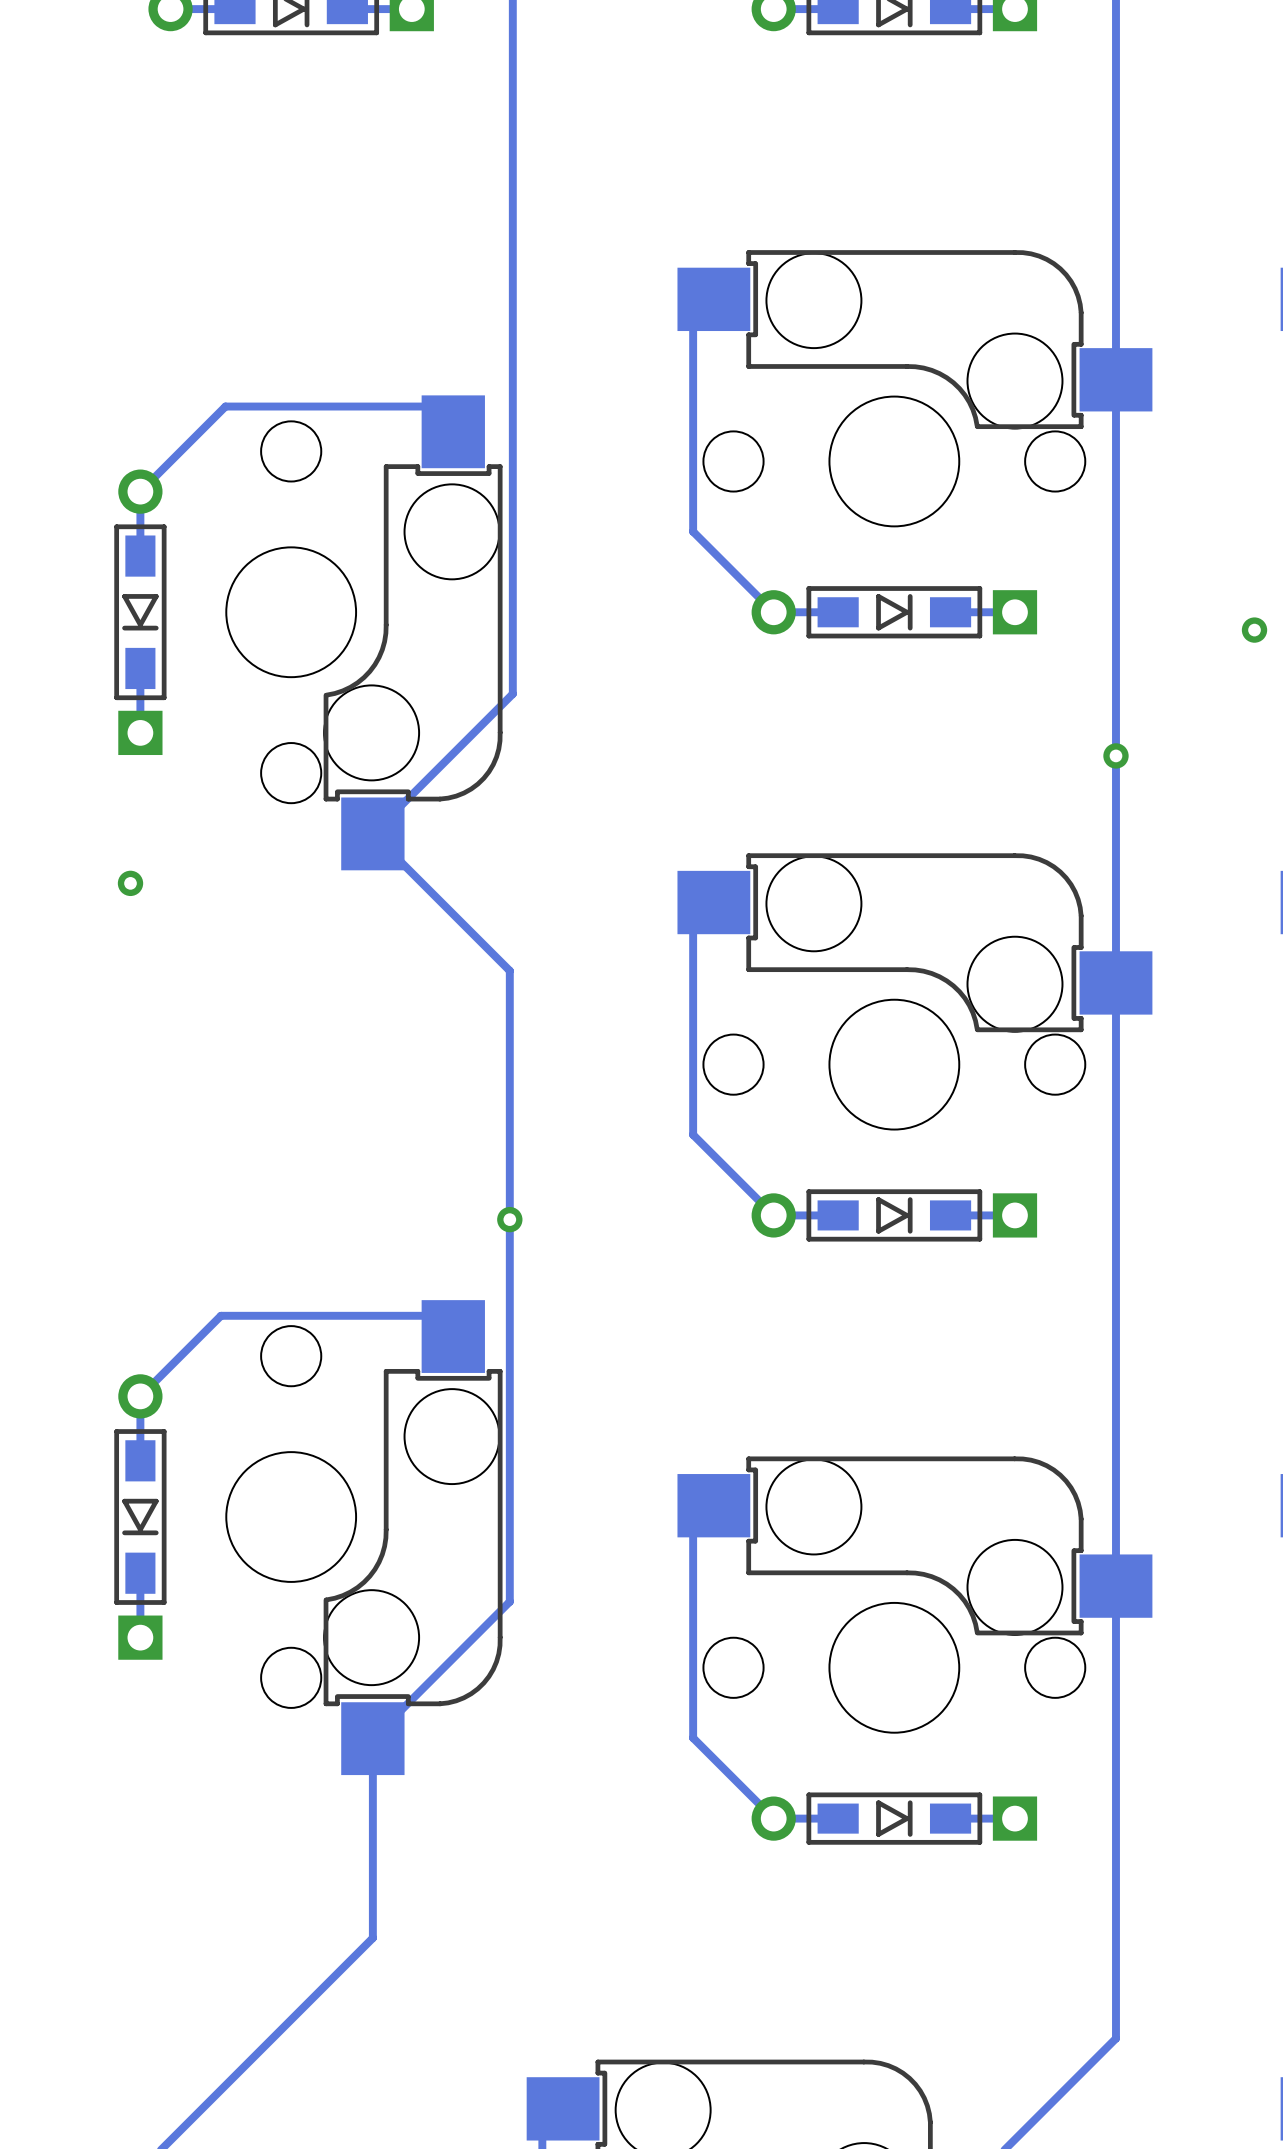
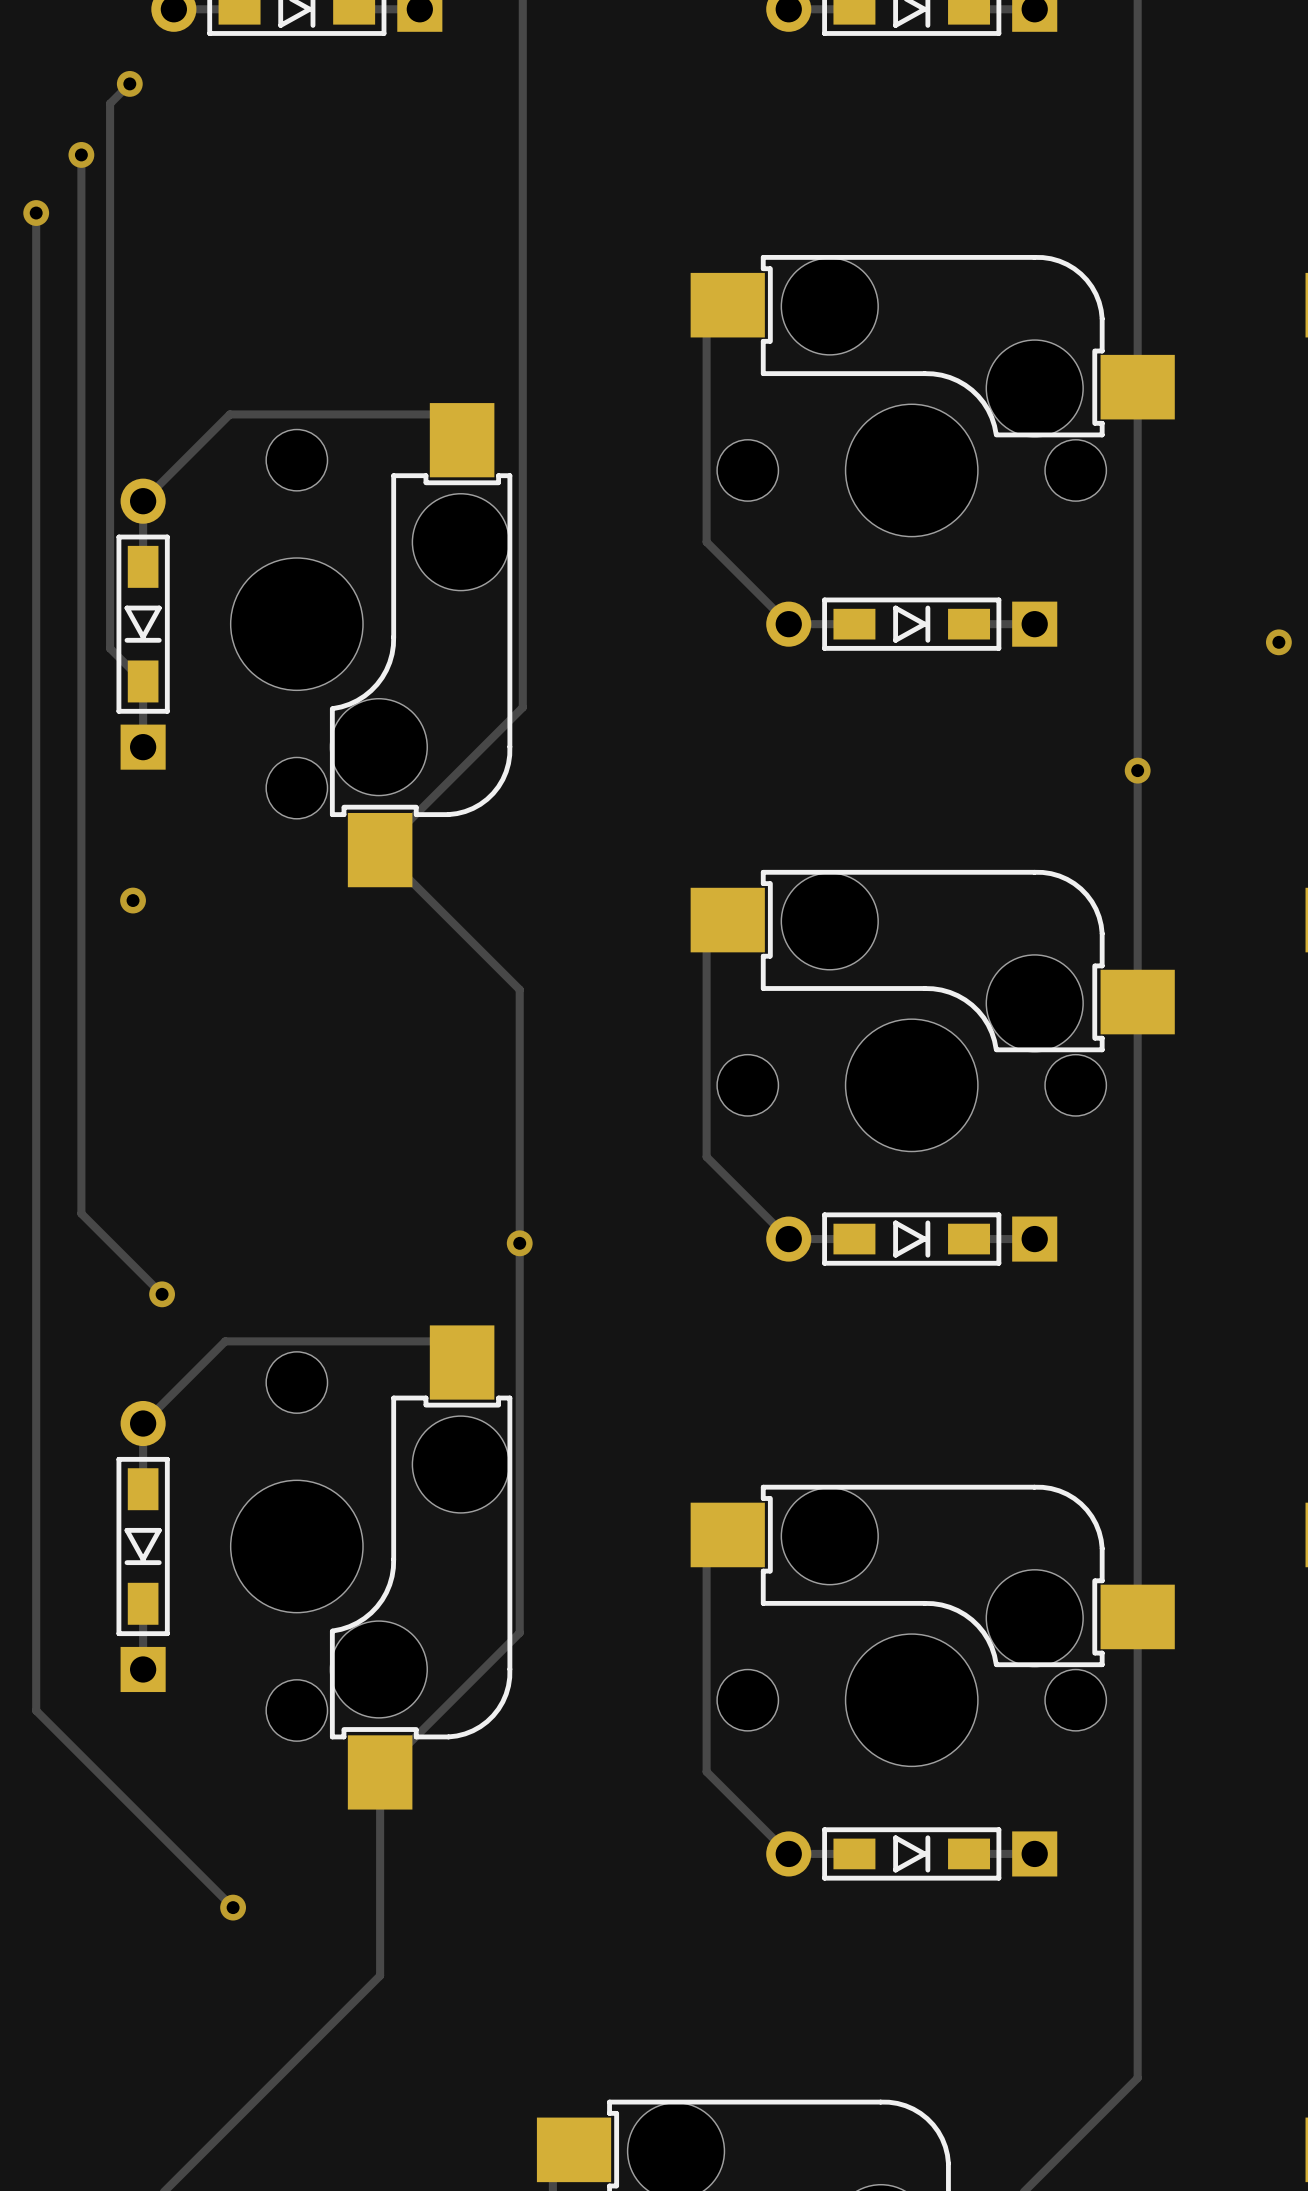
track: none -> (129, 83) (110, 103) (110, 648) (143, 681)
via: none -> (129, 83)
track: none -> (81, 154) (81, 1213) (162, 1294)
via: none -> (81, 154)
track: none -> (36, 213) (36, 1710) (233, 1907)
via: none -> (36, 213)
via: none -> (162, 1294)
via: none -> (233, 1907)

